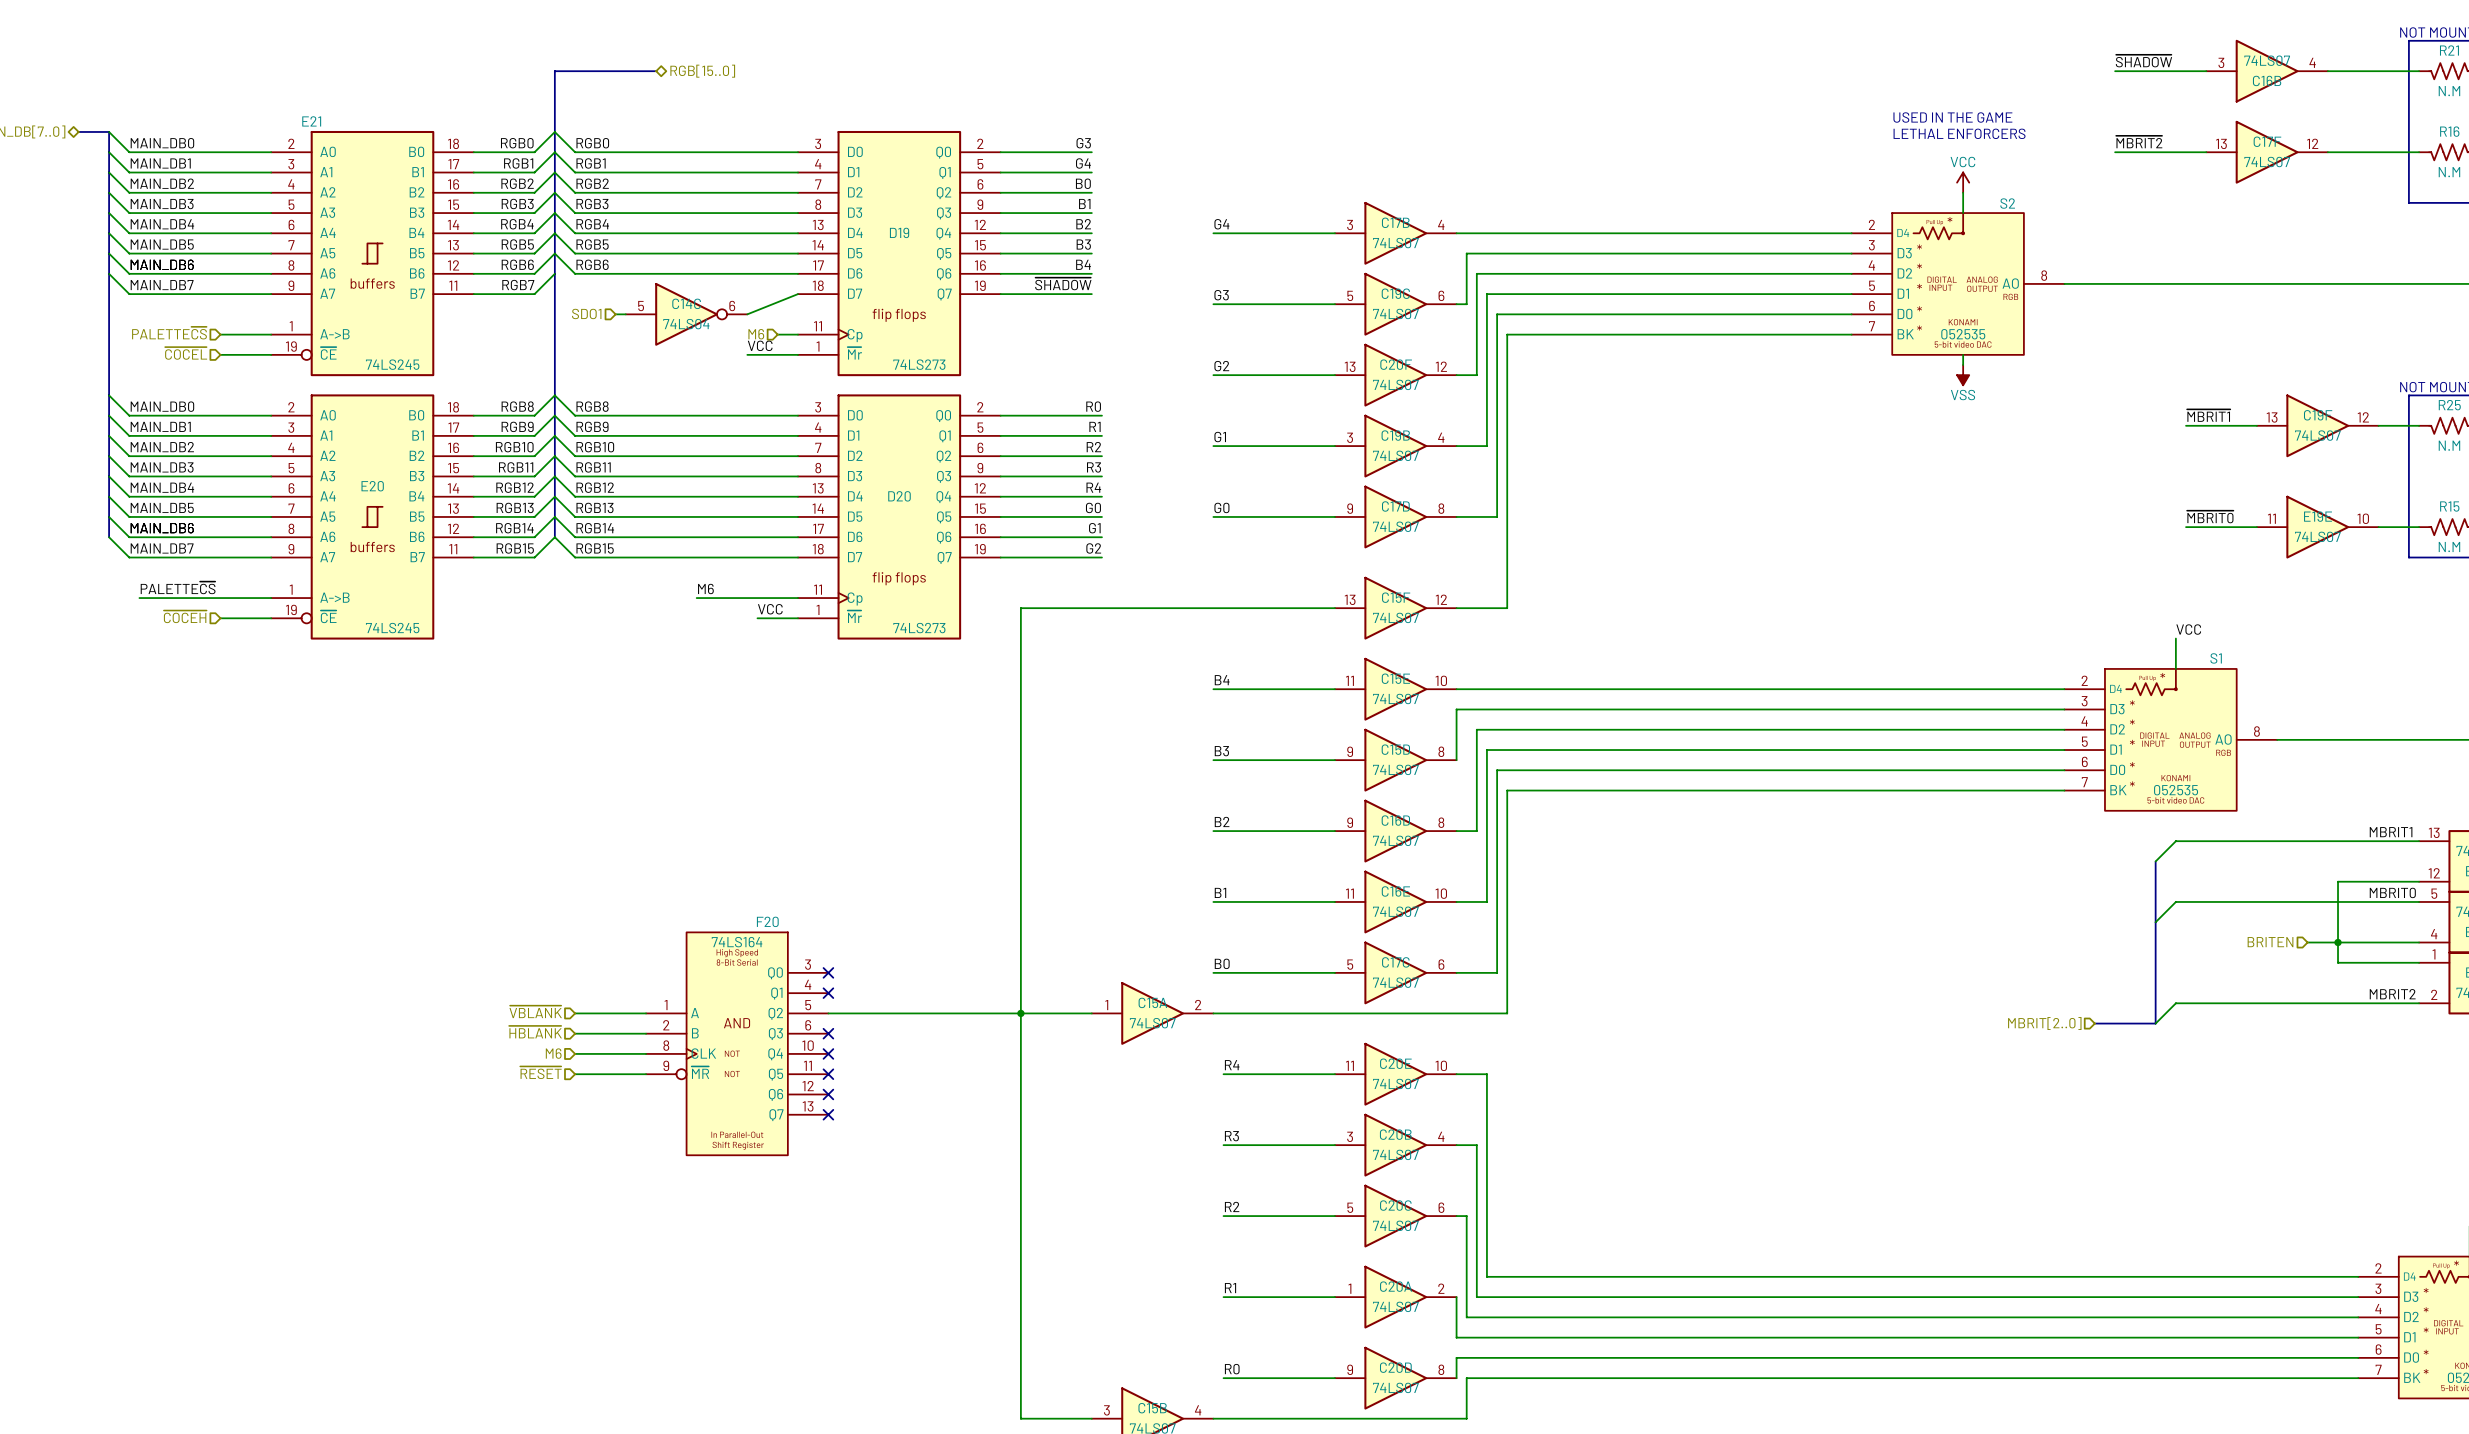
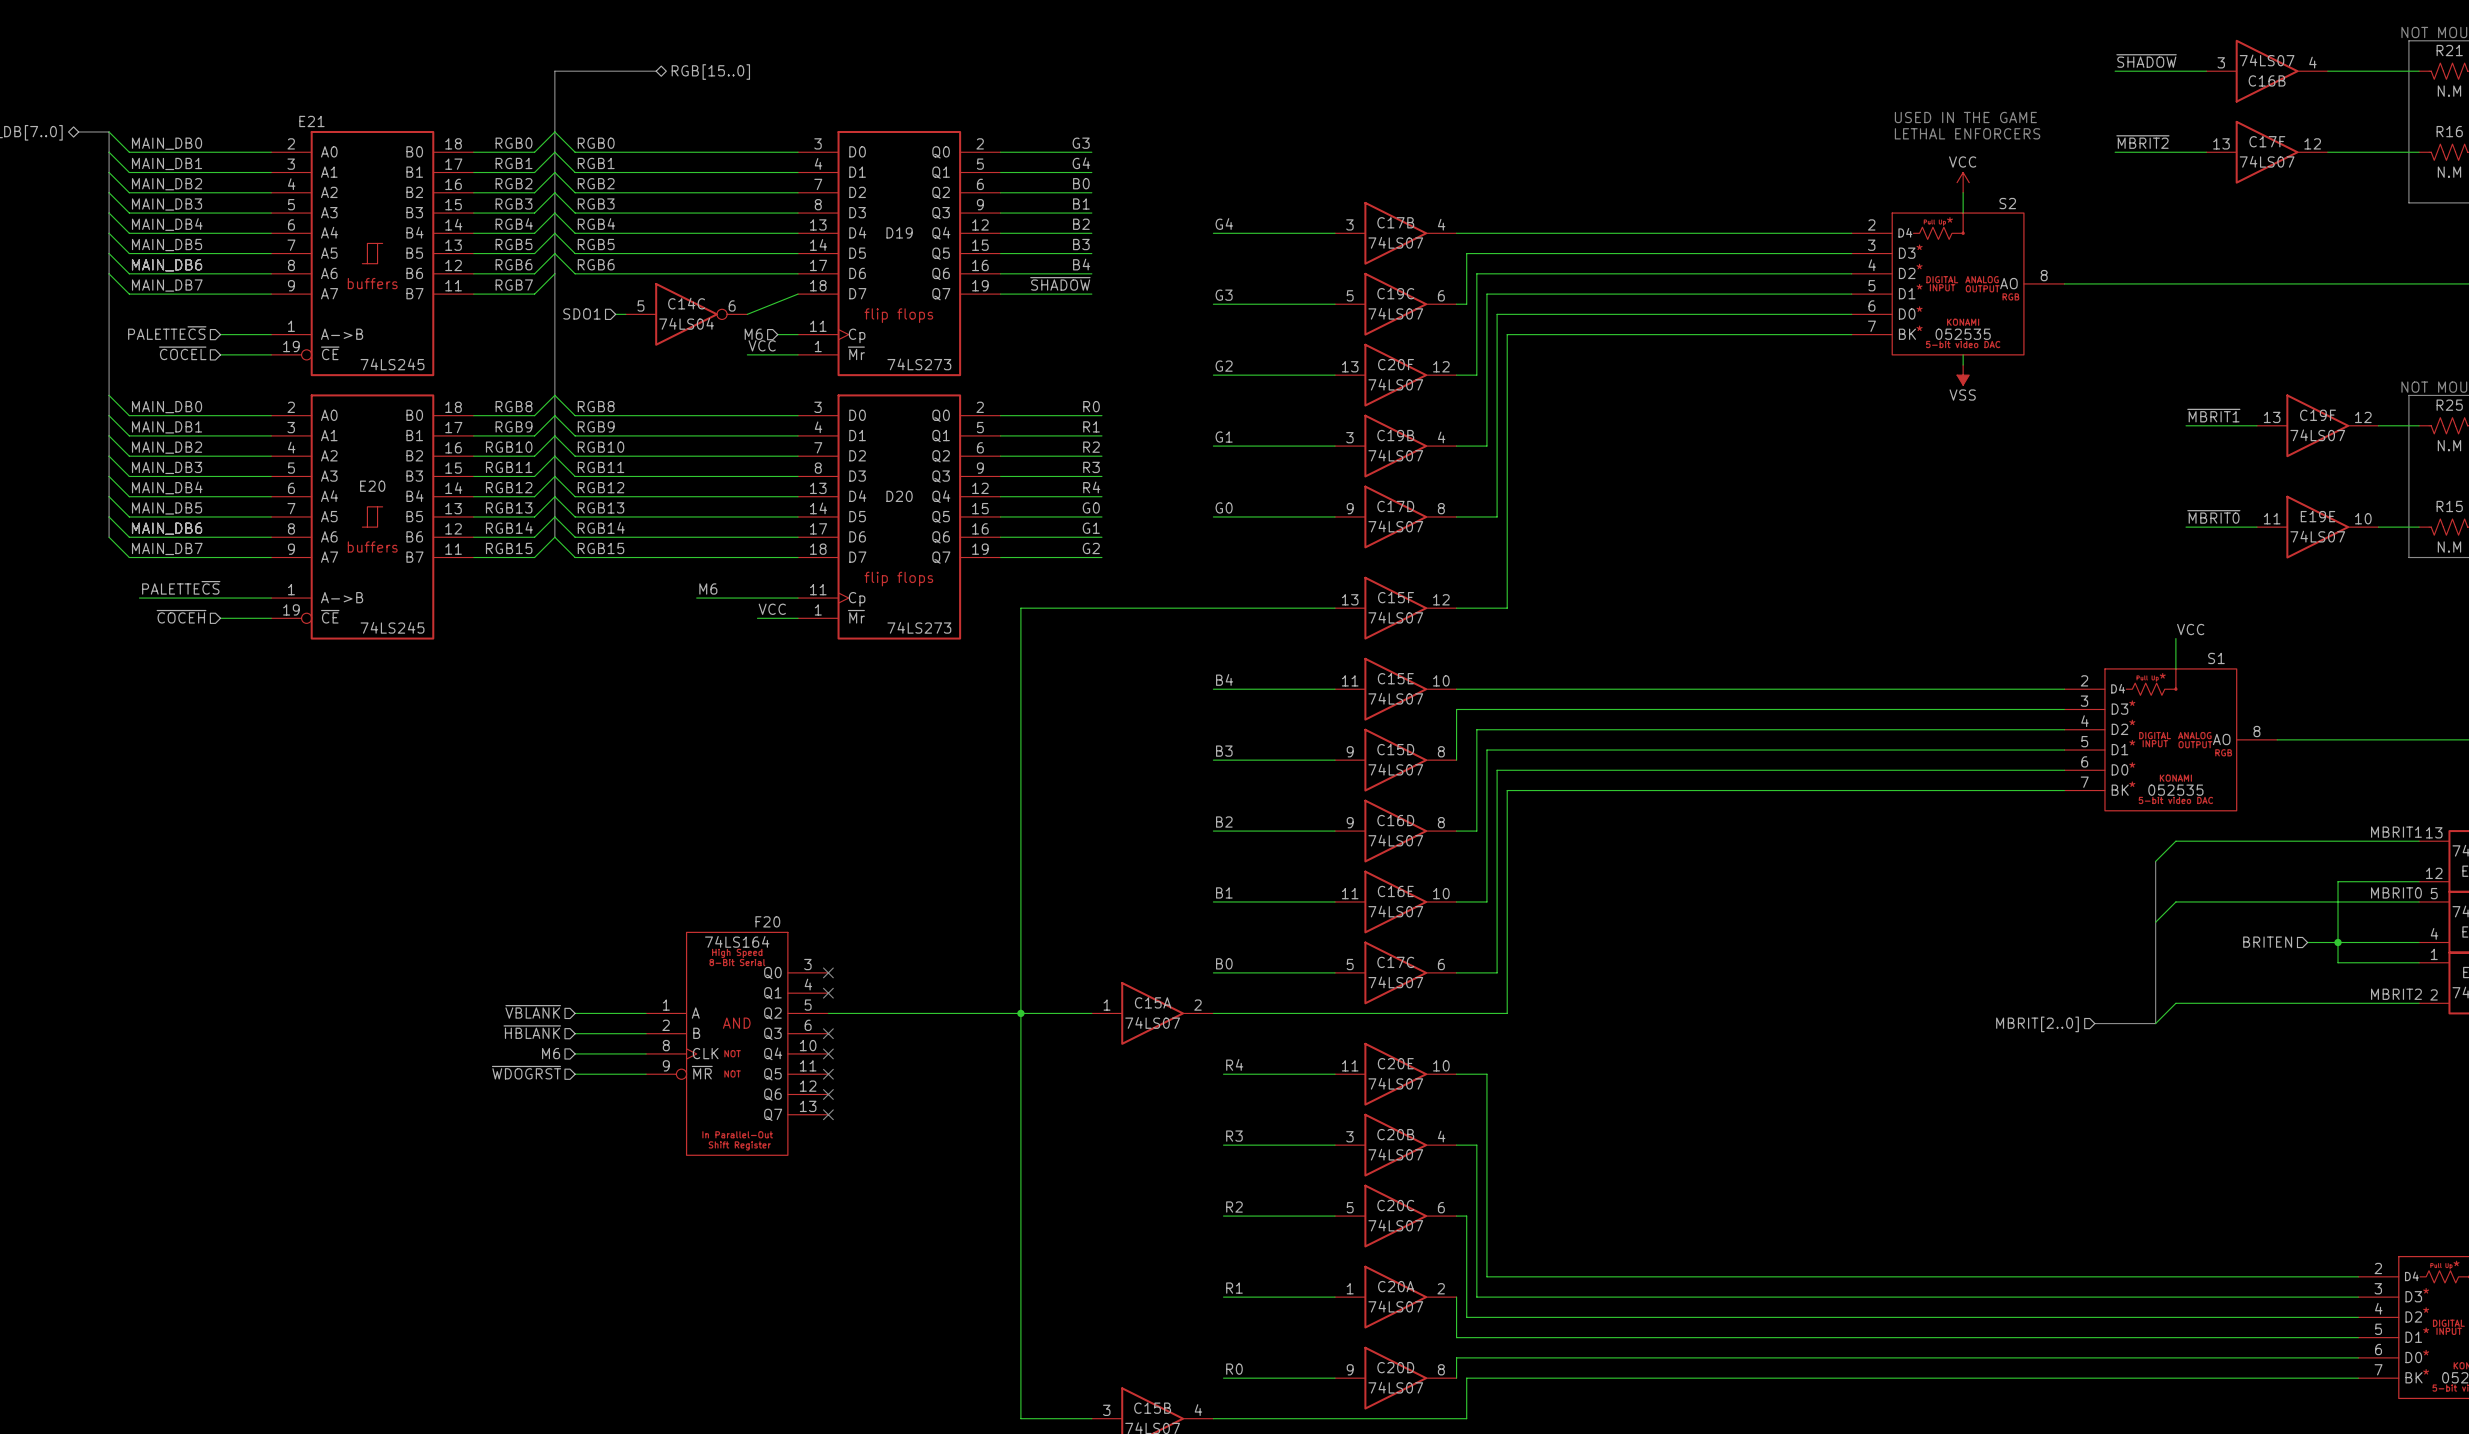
hierarchical label: ~{RESET} (540, 1072) -> ~{WDOGRST} (526, 1072)

